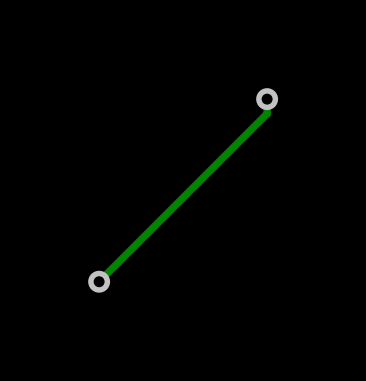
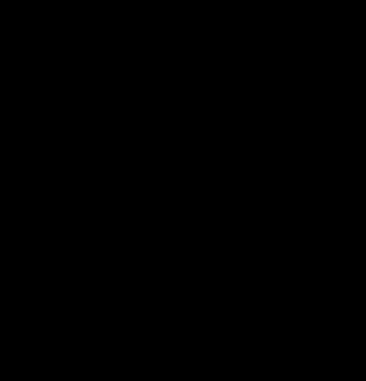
track: (267, 99) (267, 113) (99, 281) -> none
via: (267, 99) -> none
via: (99, 281) -> none

